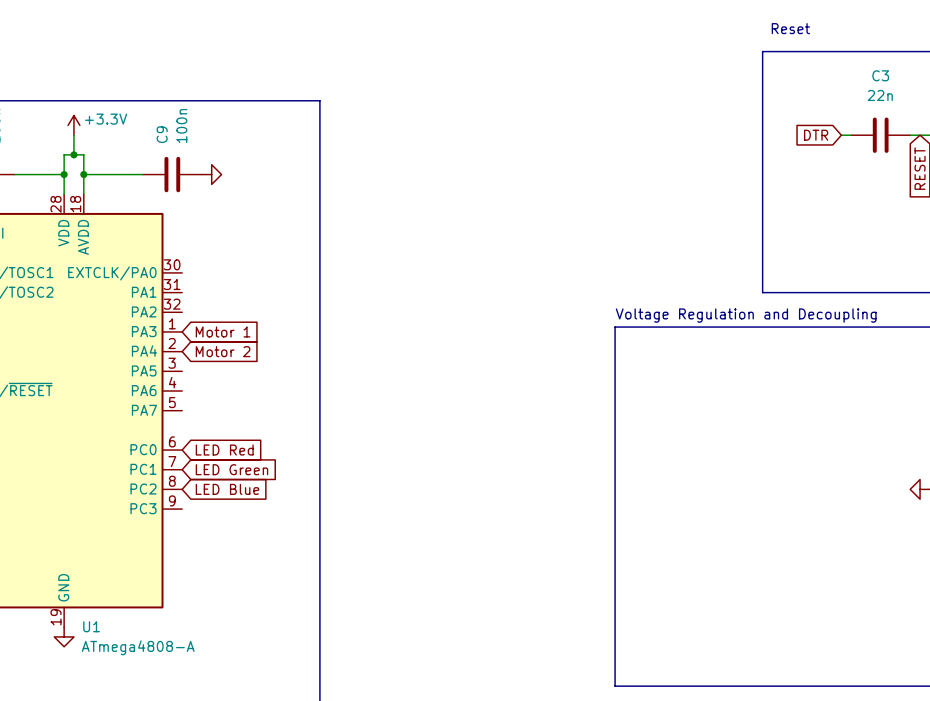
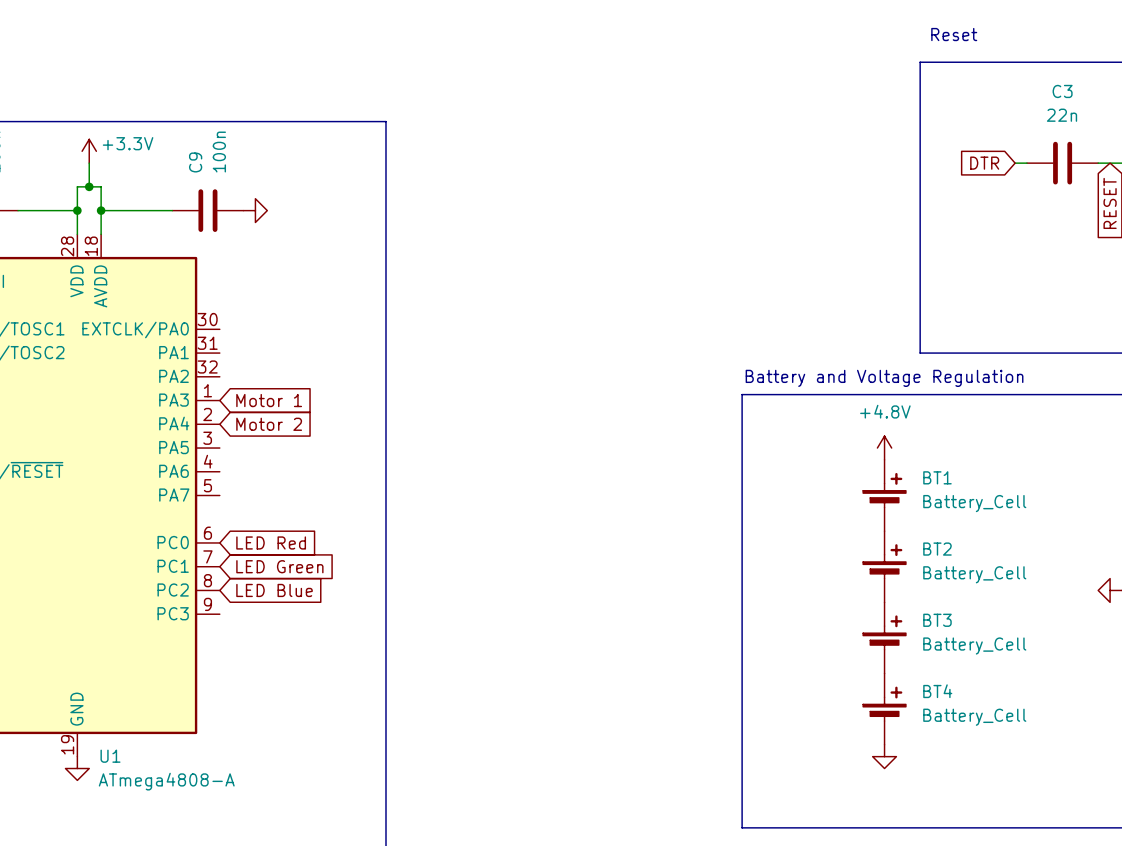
text: none -> Battery and Voltage Regulation (884, 378)
text: Voltage Regulation and Decoupling (746, 315) -> none
power symbol: none -> +4.8V (884, 448)
BT1: none -> Battery_Cell (884, 495)
BT2: none -> Battery_Cell (884, 566)
BT3: none -> Battery_Cell (884, 637)
BT4: none -> Battery_Cell (884, 709)
power symbol: none -> (884, 756)

